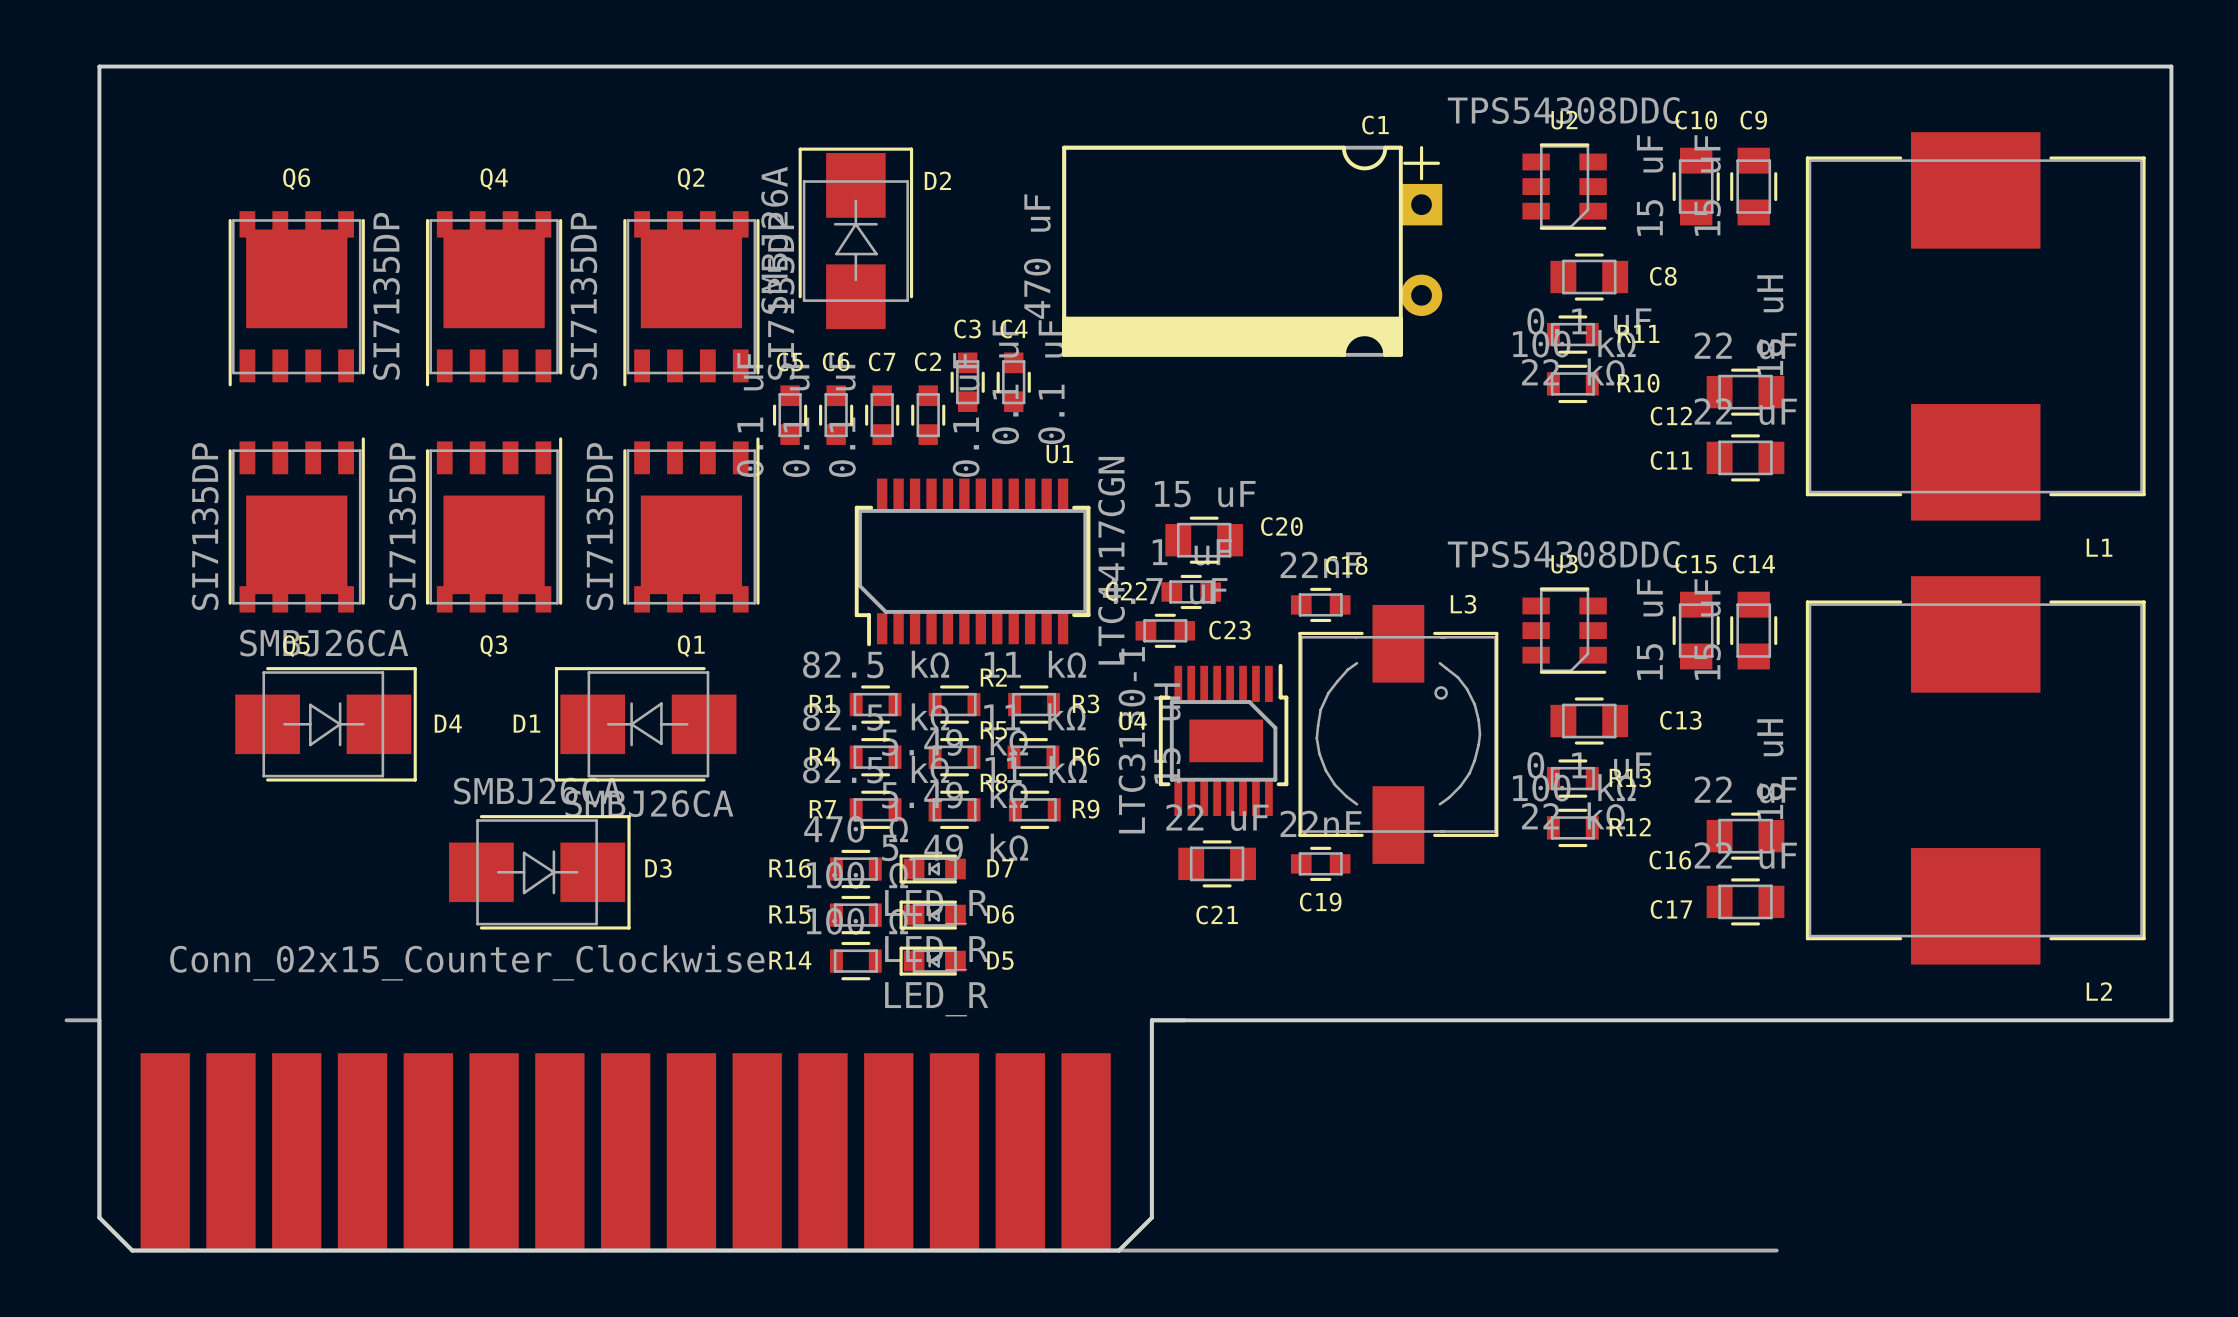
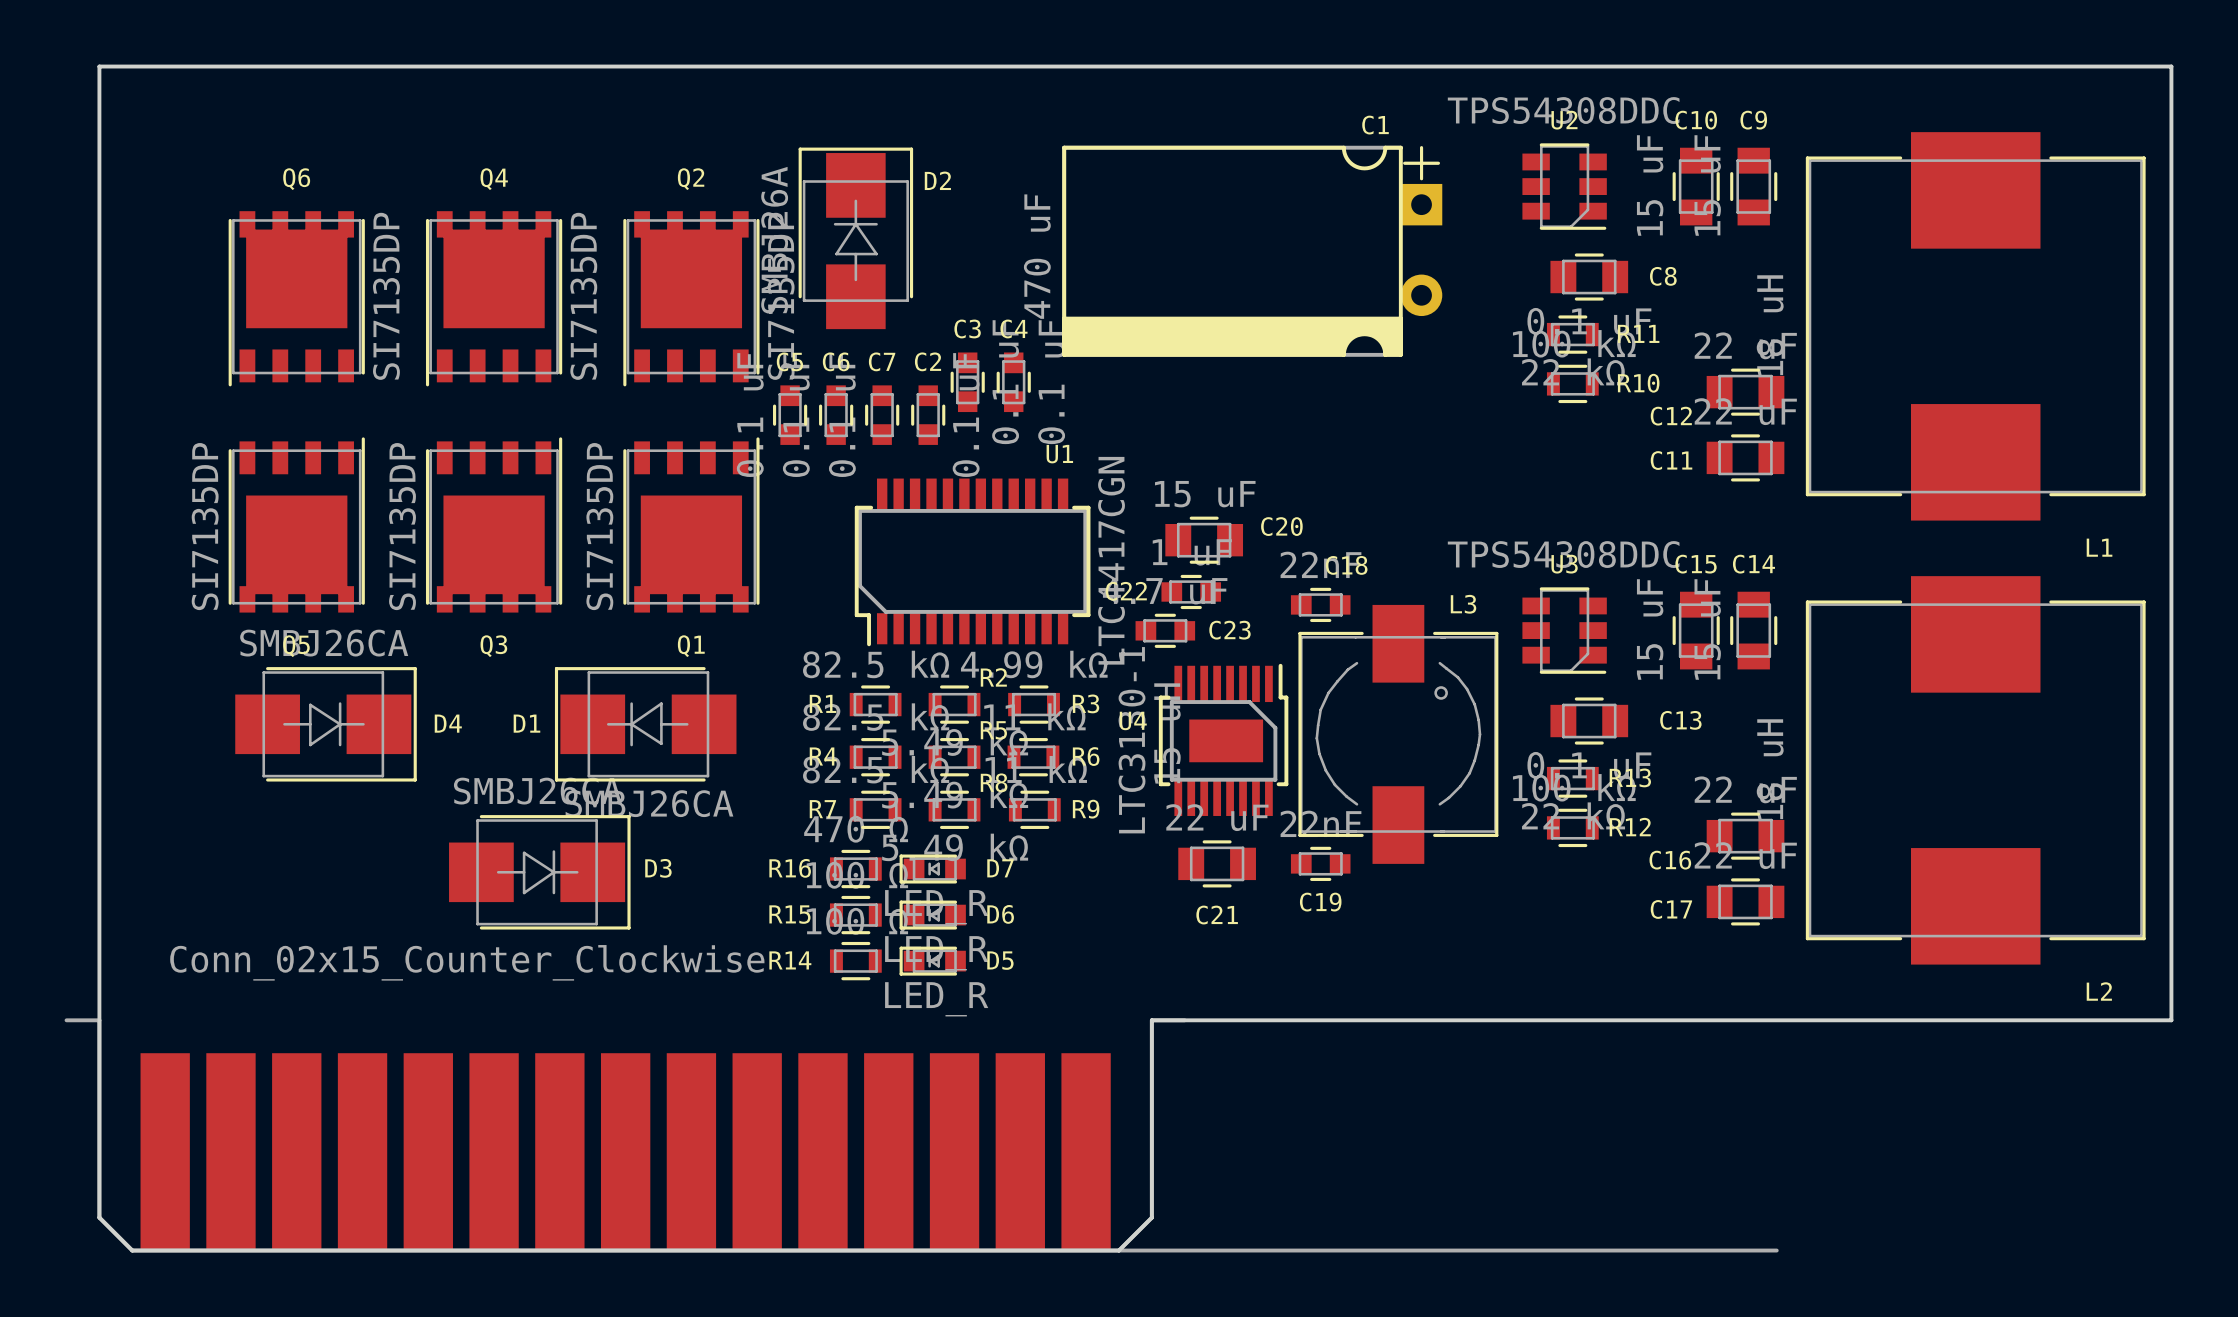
R3 value: 11 kΩ (1035, 664) -> 4.99 kΩ (1034, 664)

